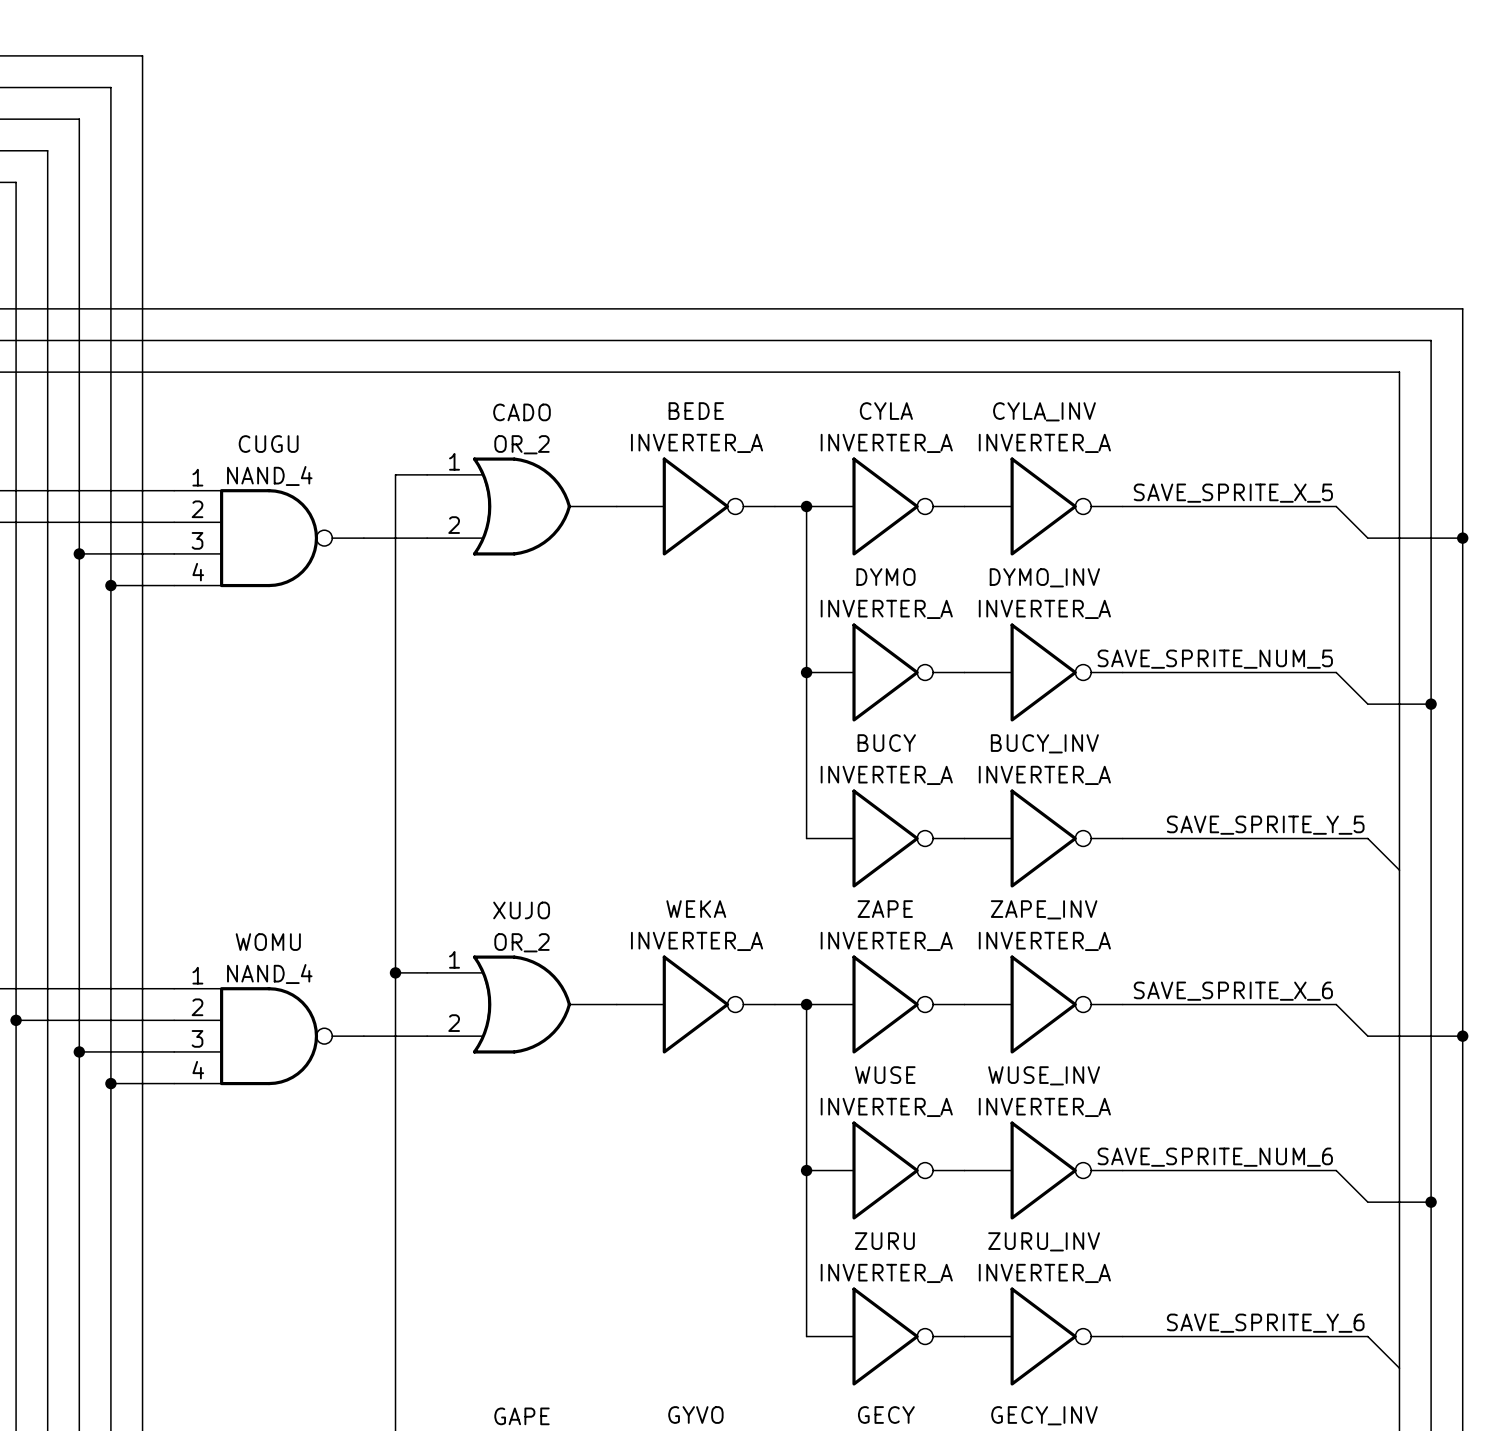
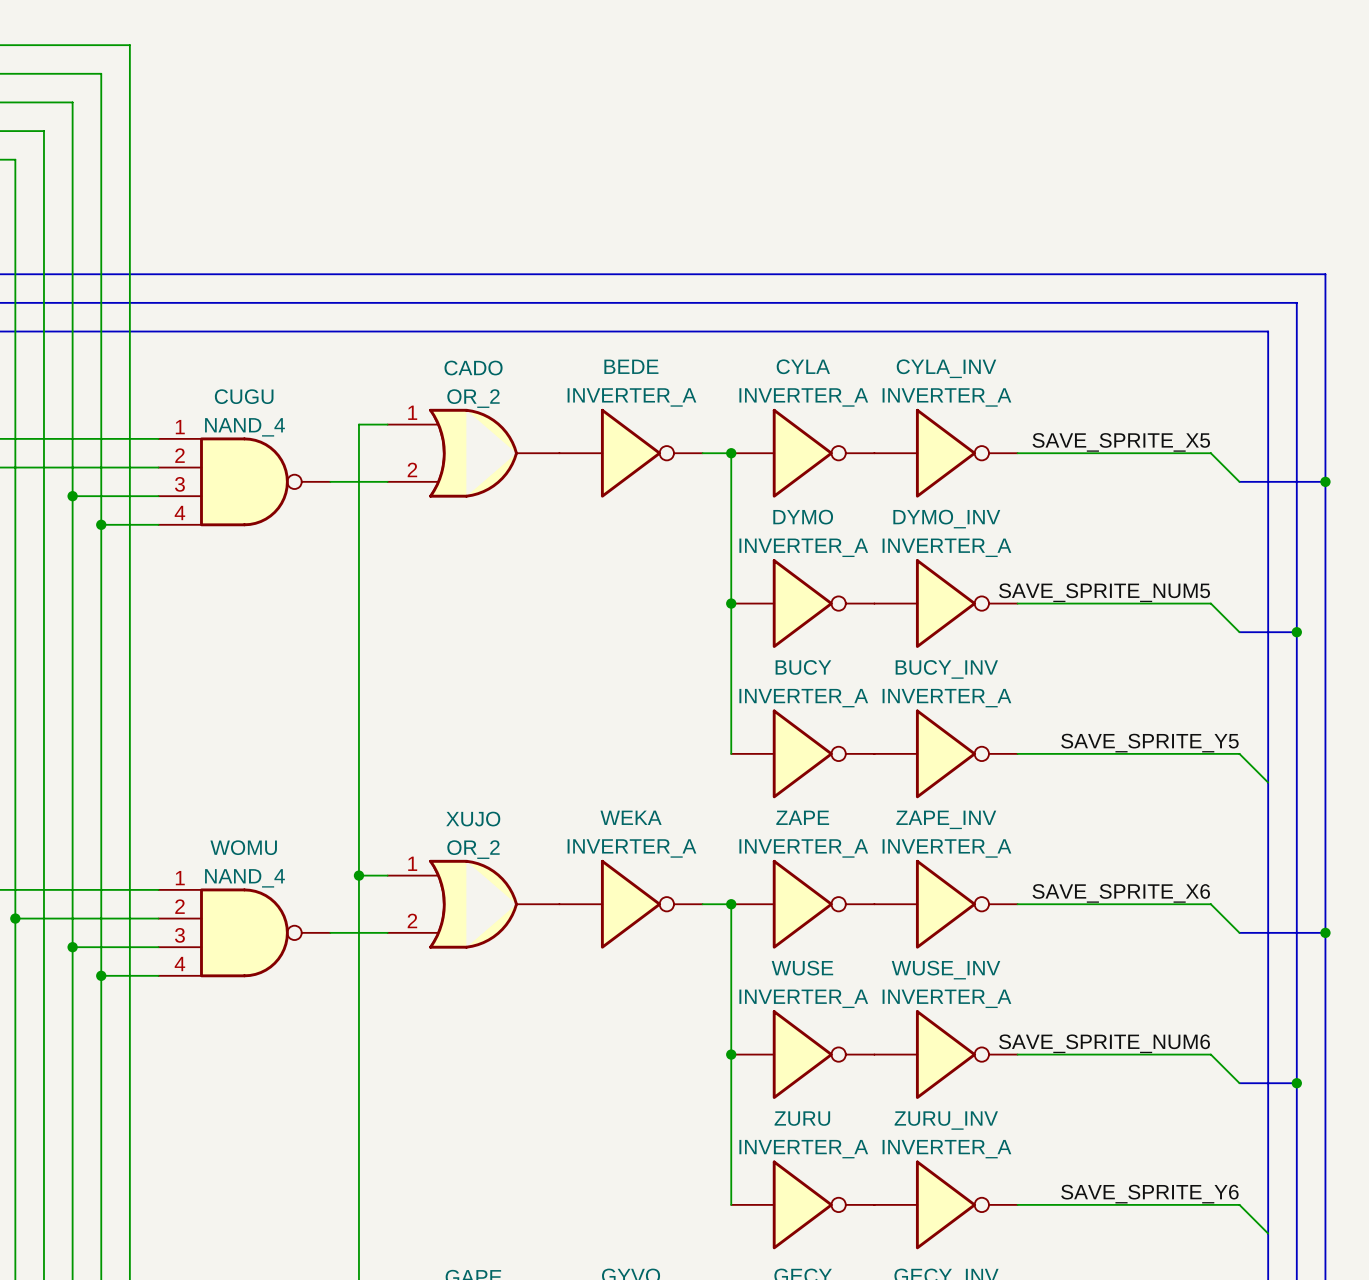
label: SAVE_SPRITE_X_5 (1233, 493) -> SAVE_SPRITE_X5 (1121, 442)
label: SAVE_SPRITE_NUM_5 (1215, 659) -> SAVE_SPRITE_NUM5 (1104, 592)
label: SAVE_SPRITE_Y_5 (1265, 825) -> SAVE_SPRITE_Y5 (1149, 743)
label: SAVE_SPRITE_X_6 (1233, 991) -> SAVE_SPRITE_X6 (1121, 893)
label: SAVE_SPRITE_NUM_6 (1215, 1157) -> SAVE_SPRITE_NUM6 (1104, 1043)
label: SAVE_SPRITE_Y_6 (1265, 1323) -> SAVE_SPRITE_Y6 (1149, 1194)

